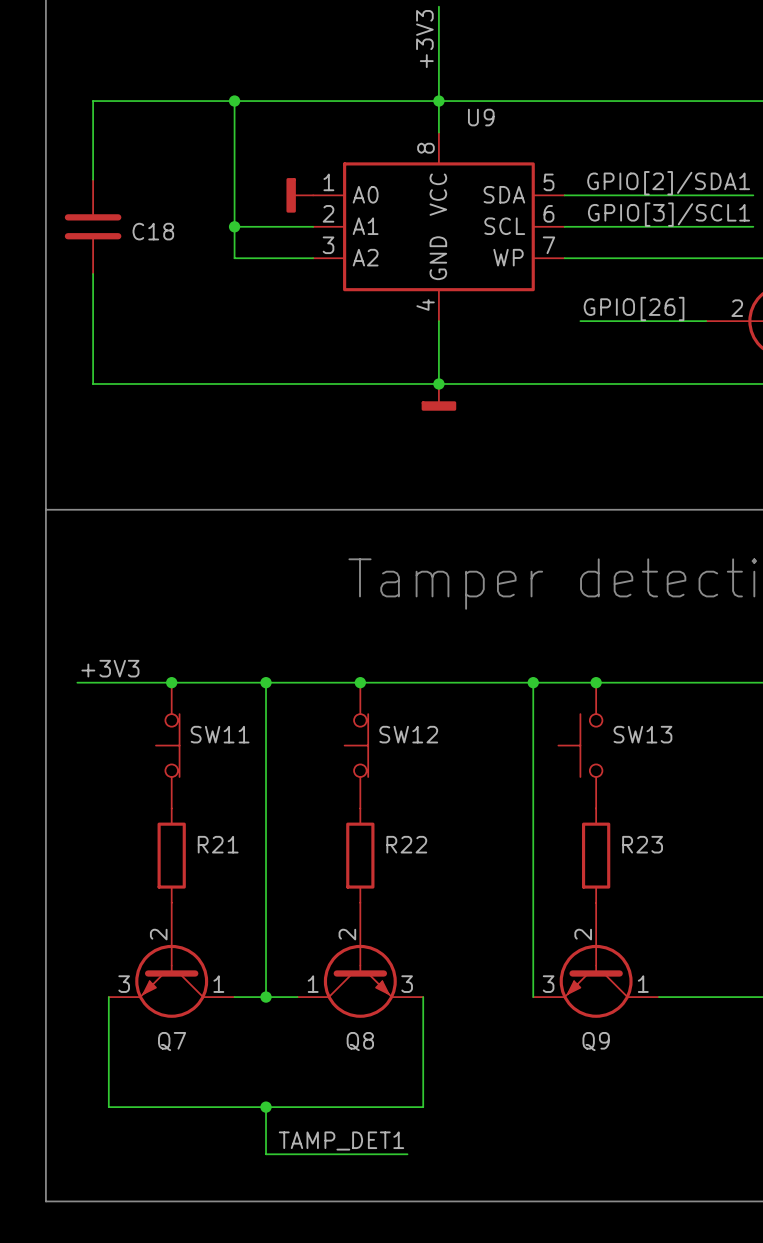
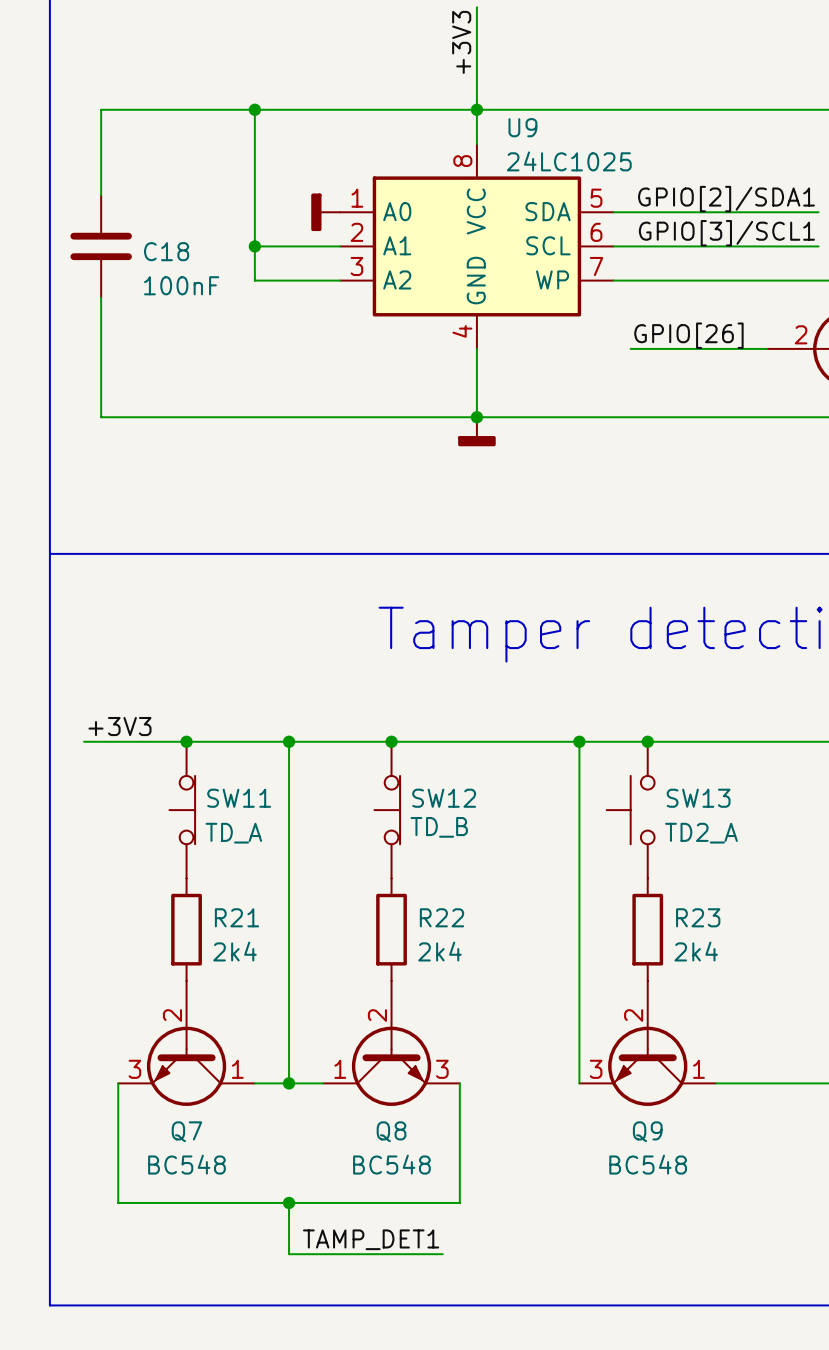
U9 value: none -> 24LC1025 (569, 161)
C18 value: none -> 100nF (181, 285)
SW12 value: none -> TD_B (439, 827)
SW11 value: none -> TD_A (233, 833)
SW13 value: none -> TD2_A (701, 833)
R21 value: none -> 2k4 (235, 951)
R22 value: none -> 2k4 (439, 951)
R23 value: none -> 2k4 (696, 951)
Q7 value: none -> BC548 (186, 1164)
Q8 value: none -> BC548 (391, 1164)
Q9 value: none -> BC548 (648, 1164)

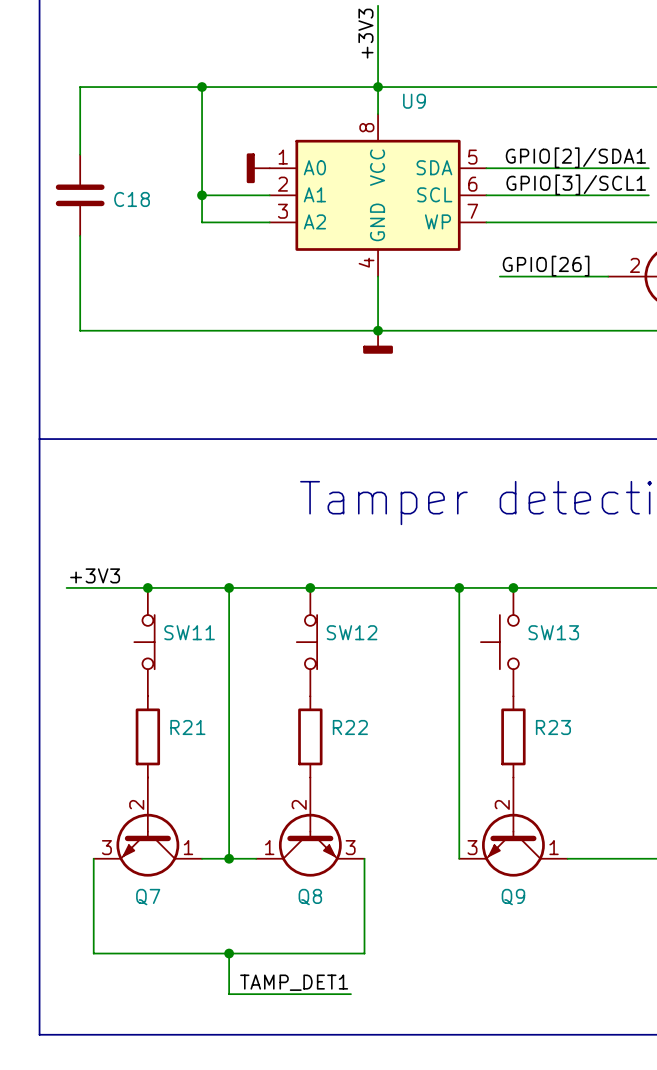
U9 value: 24LC1025 (569, 161) -> none
C18 value: 100nF (181, 285) -> none
SW12 value: TD_B (439, 827) -> none
SW11 value: TD_A (233, 833) -> none
SW13 value: TD2_A (701, 833) -> none
R21 value: 2k4 (235, 951) -> none
R22 value: 2k4 (439, 951) -> none
R23 value: 2k4 (696, 951) -> none
Q7 value: BC548 (186, 1164) -> none
Q8 value: BC548 (391, 1164) -> none
Q9 value: BC548 (648, 1164) -> none

